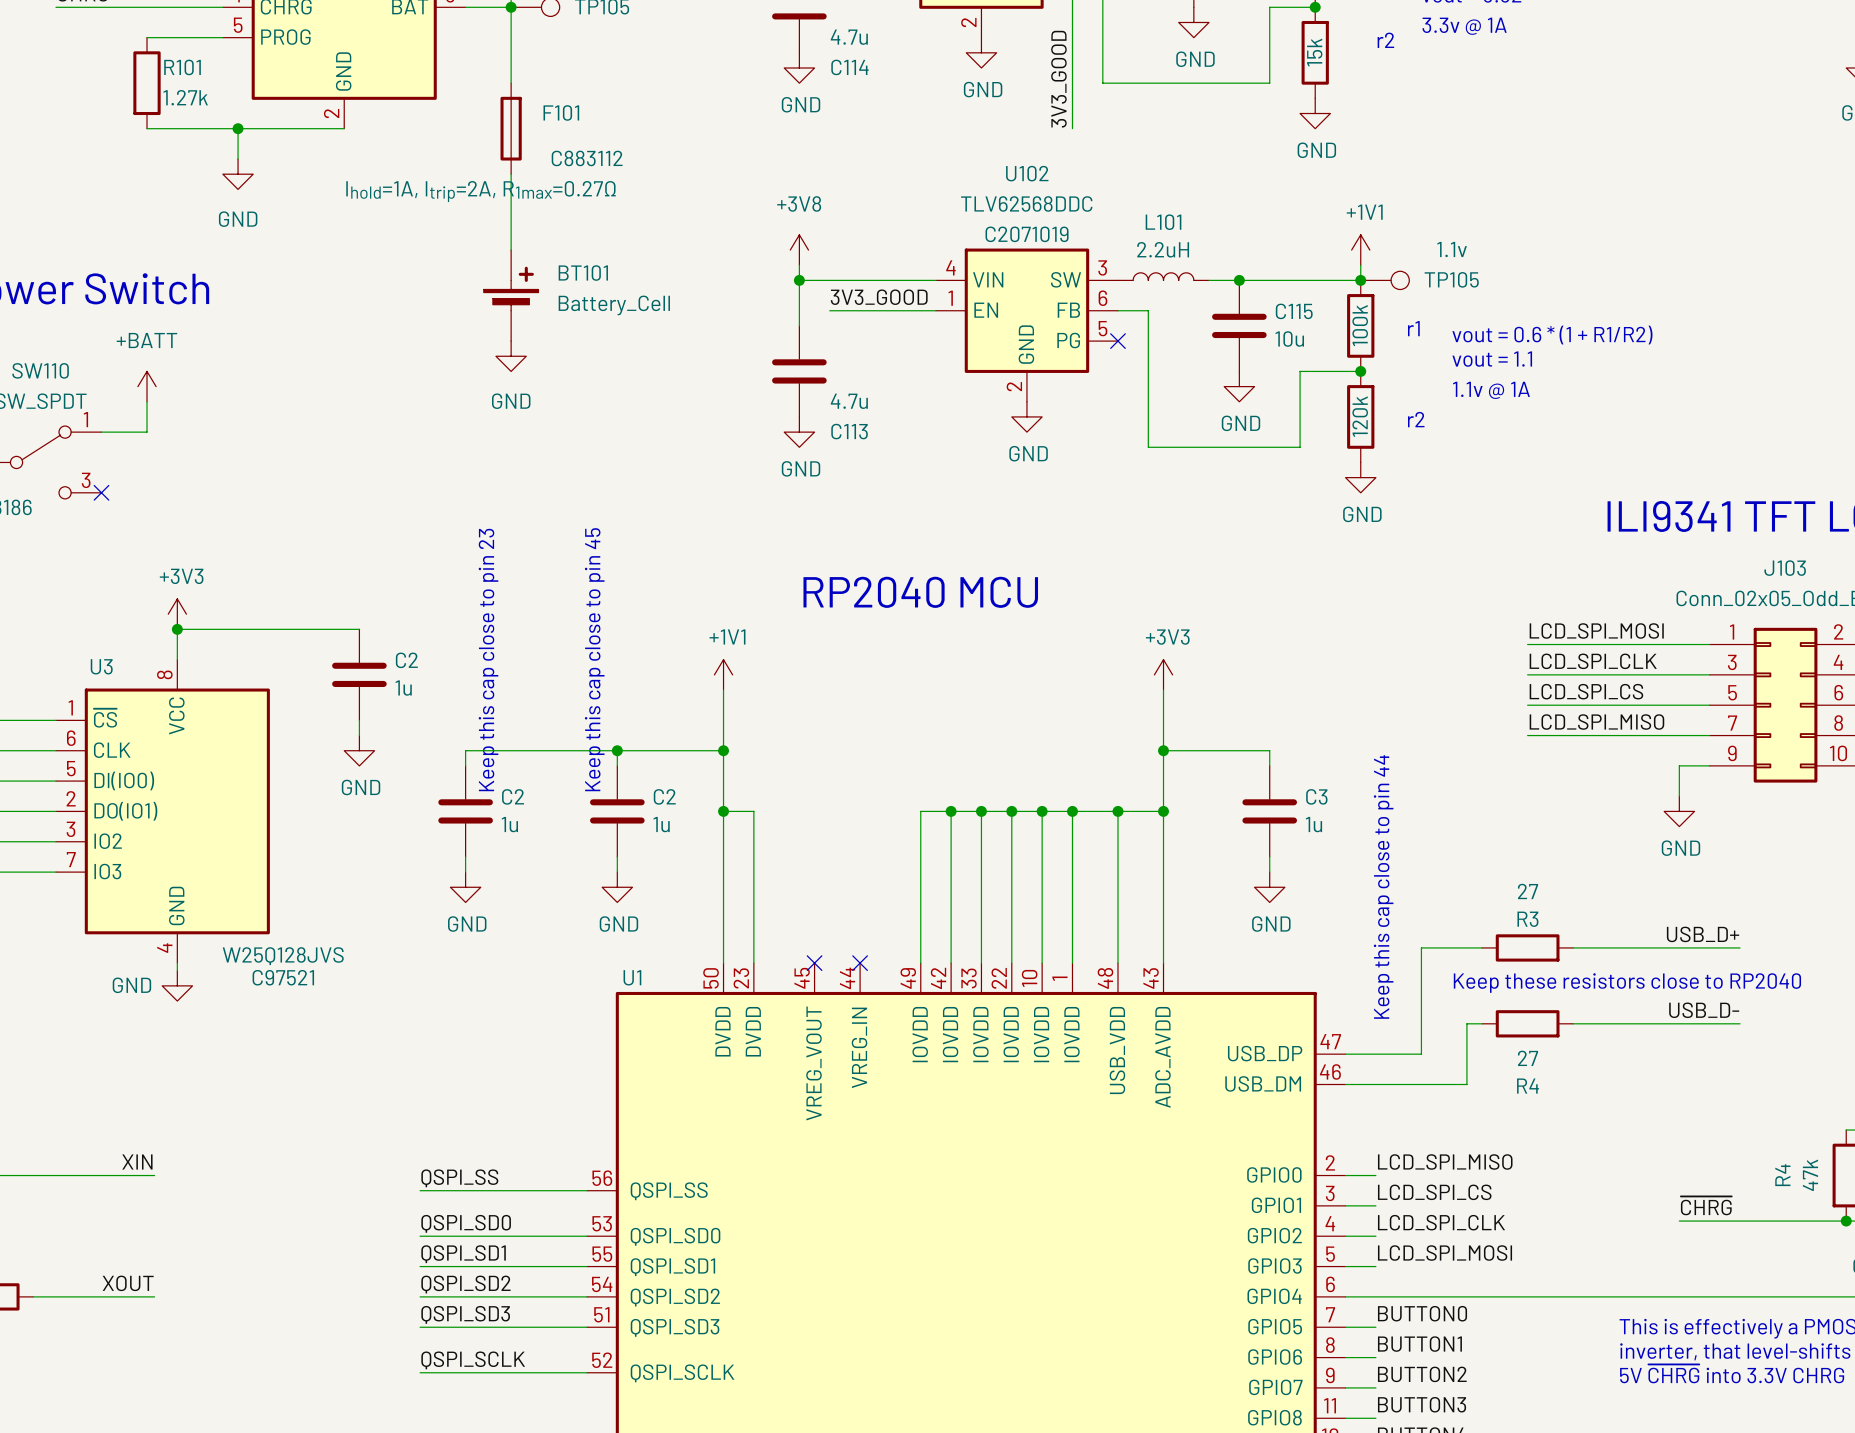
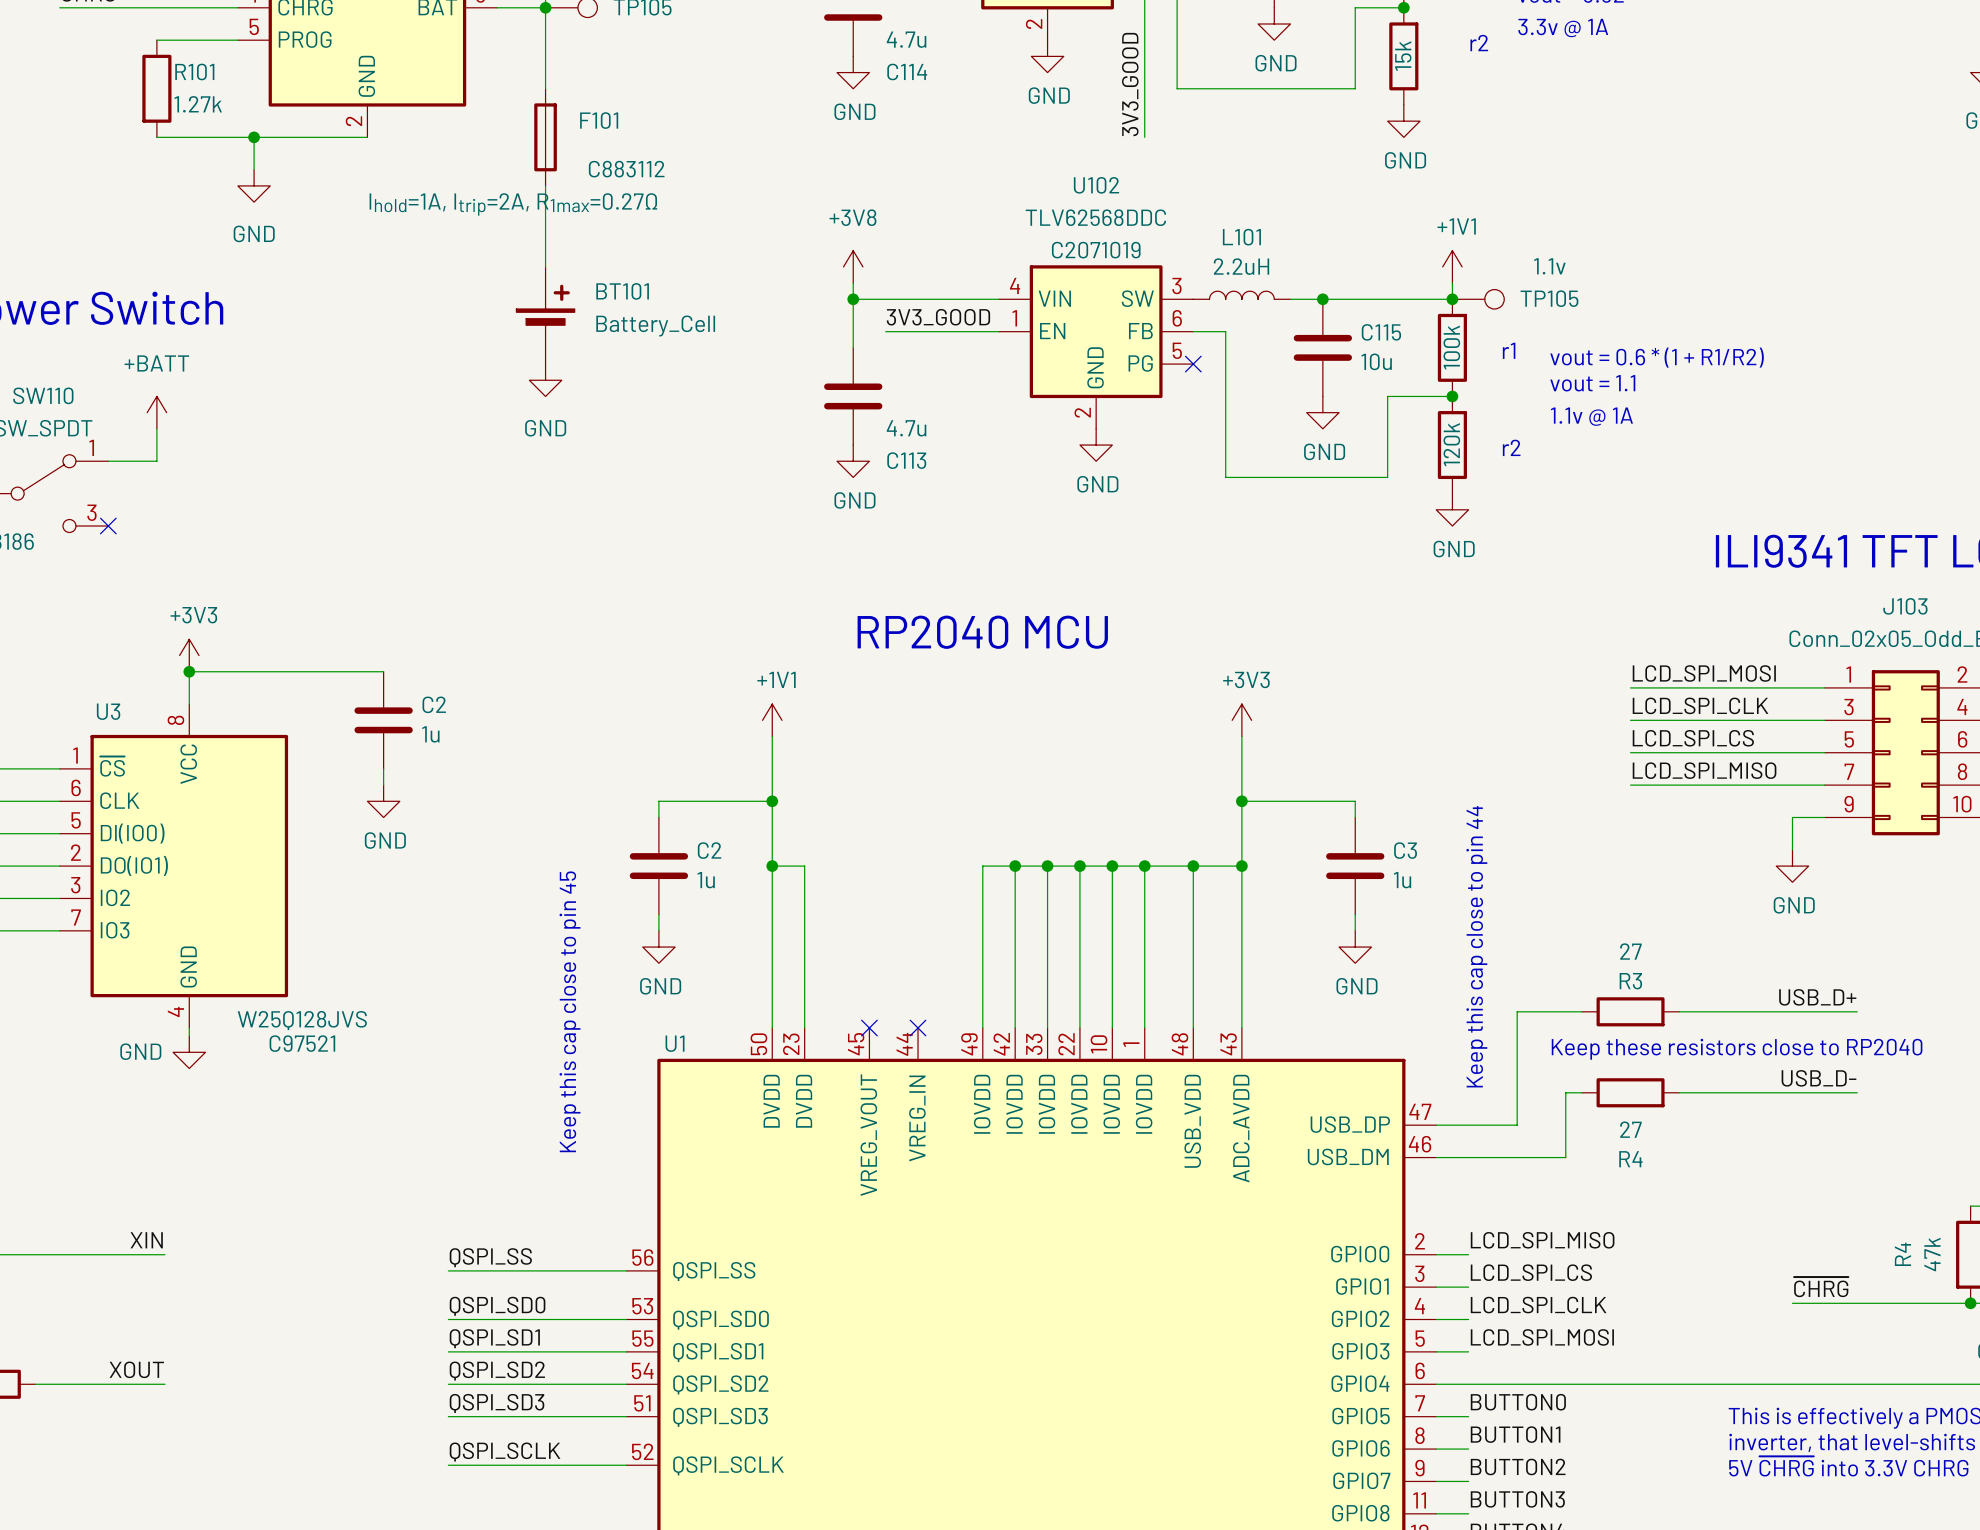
text position: Keep this cap close to pin 45 (594, 659) -> Keep this cap close to pin 45 (569, 1011)
text: Keep this cap close to pin 23 (488, 660) -> none
wire: (617, 750) (465, 750) (465, 765) -> none
junction: (617, 750) -> none
C2: 1u (465, 811) -> none
wire: (465, 856) (465, 872) -> none
power symbol: GND (465, 887) -> none

